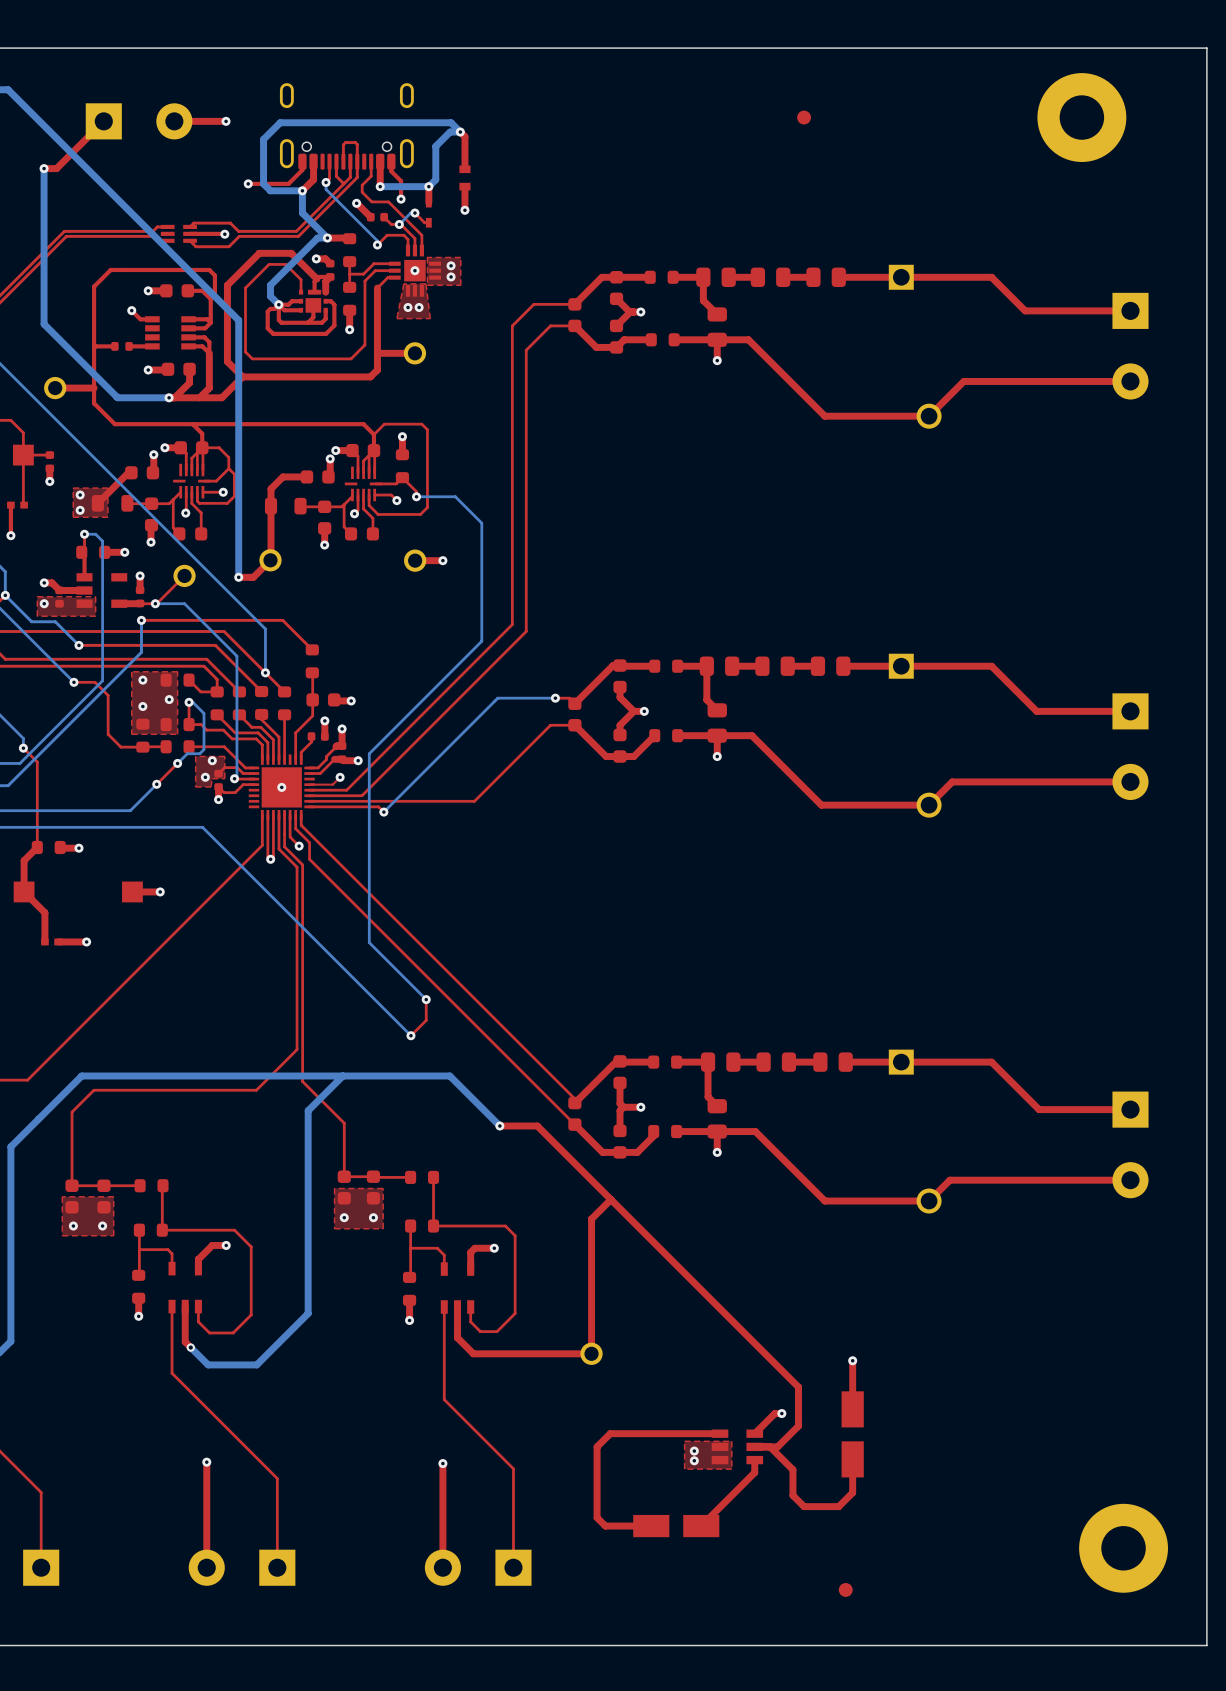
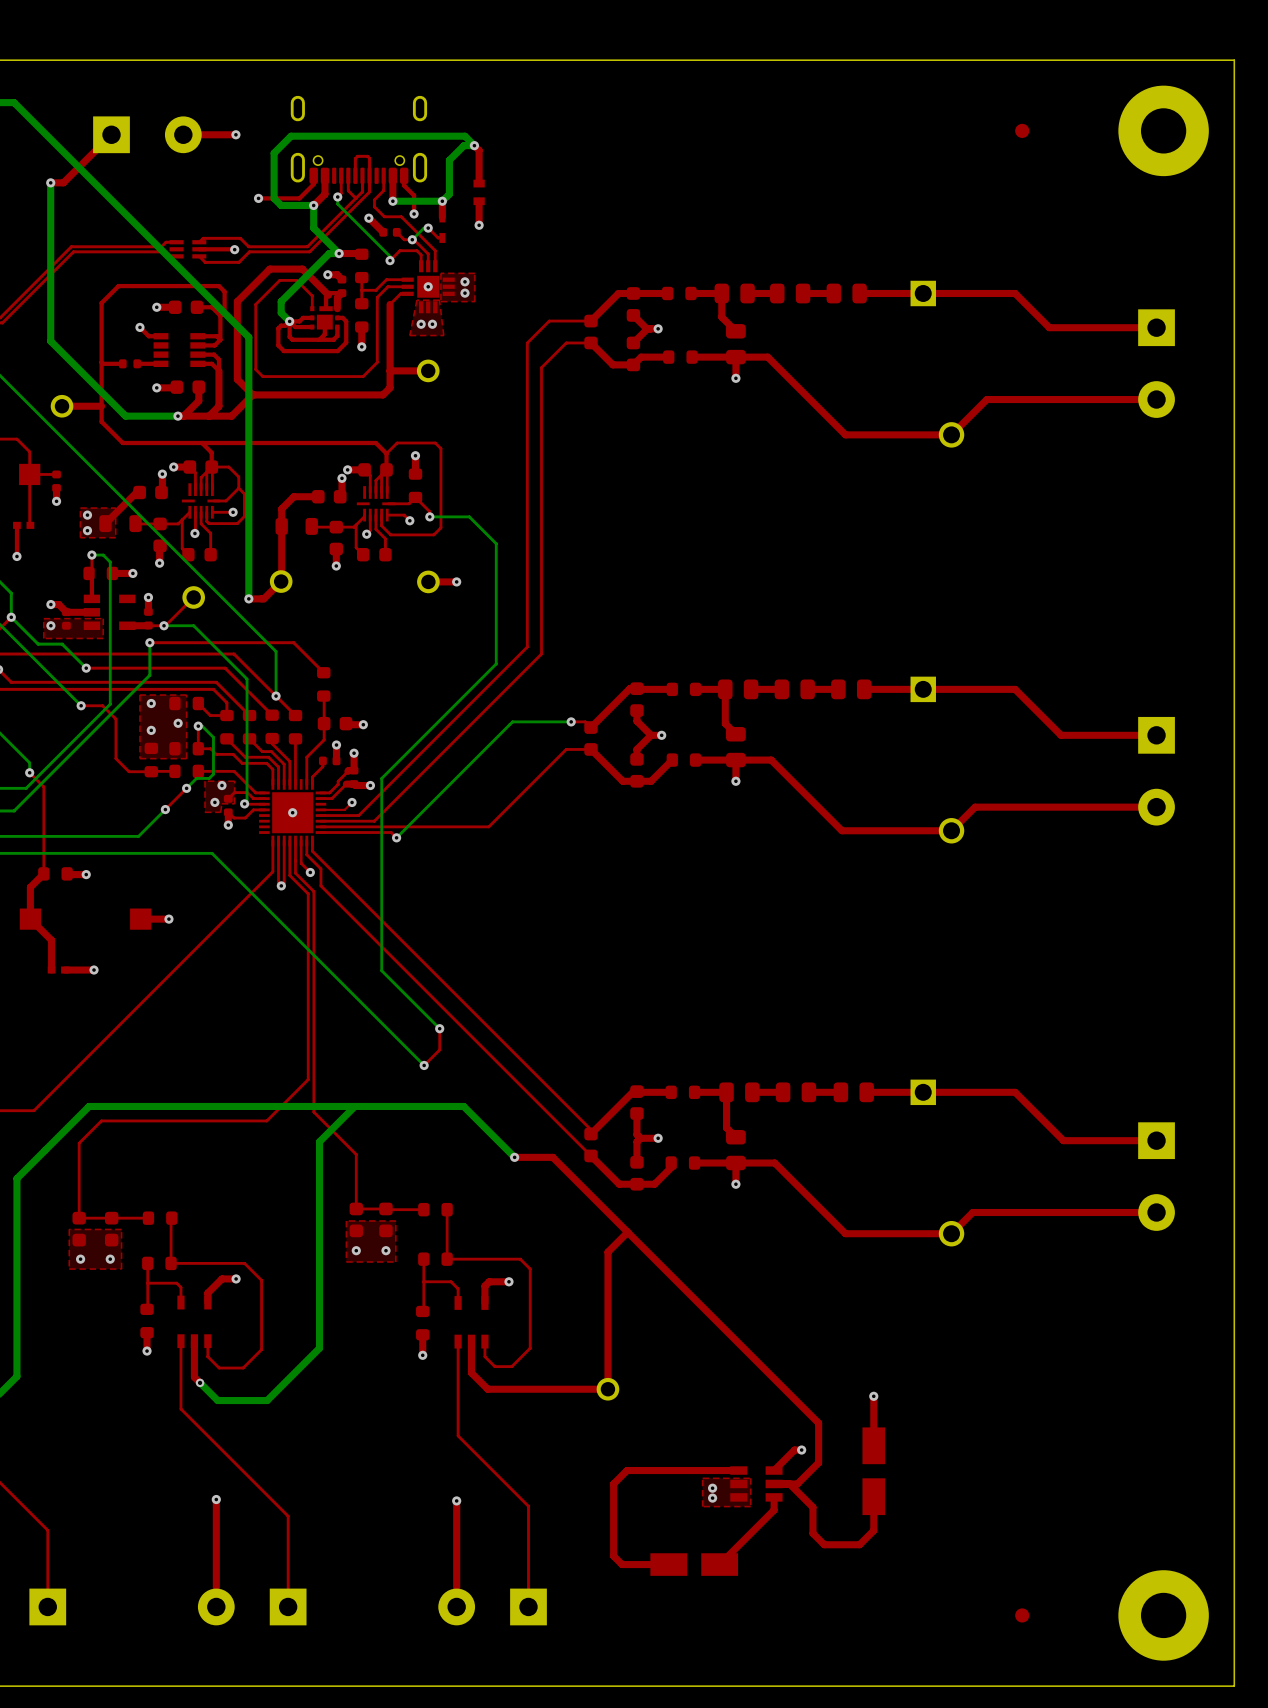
part position: (804, 117) -> (1022, 130)
part position: (1081, 117) -> (1163, 130)
part position: (1123, 1548) -> (1163, 1615)
part position: (845, 1589) -> (1022, 1615)

